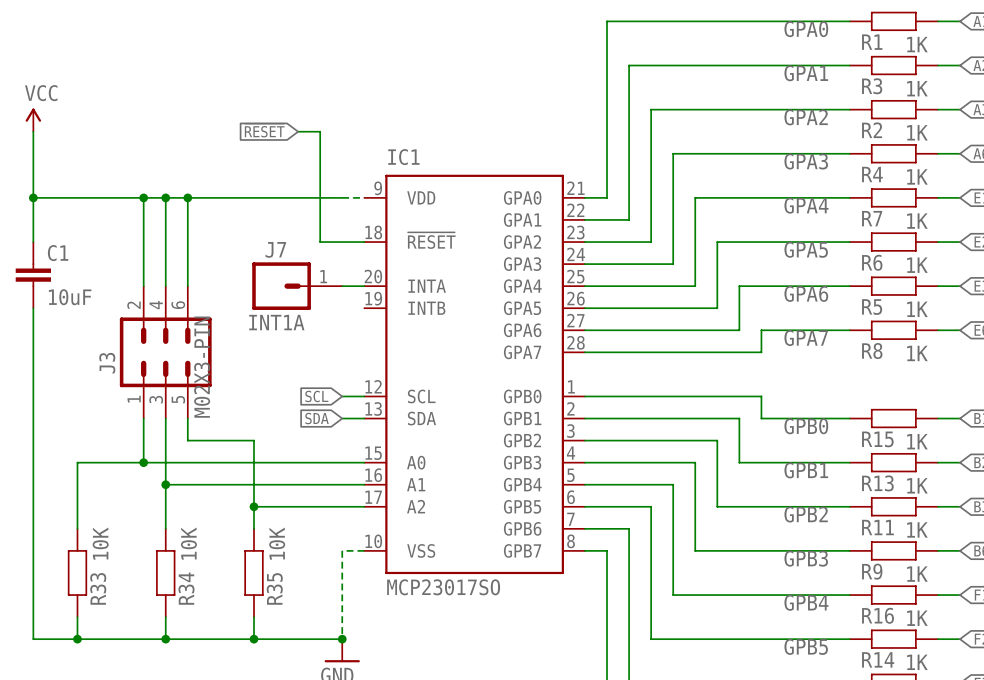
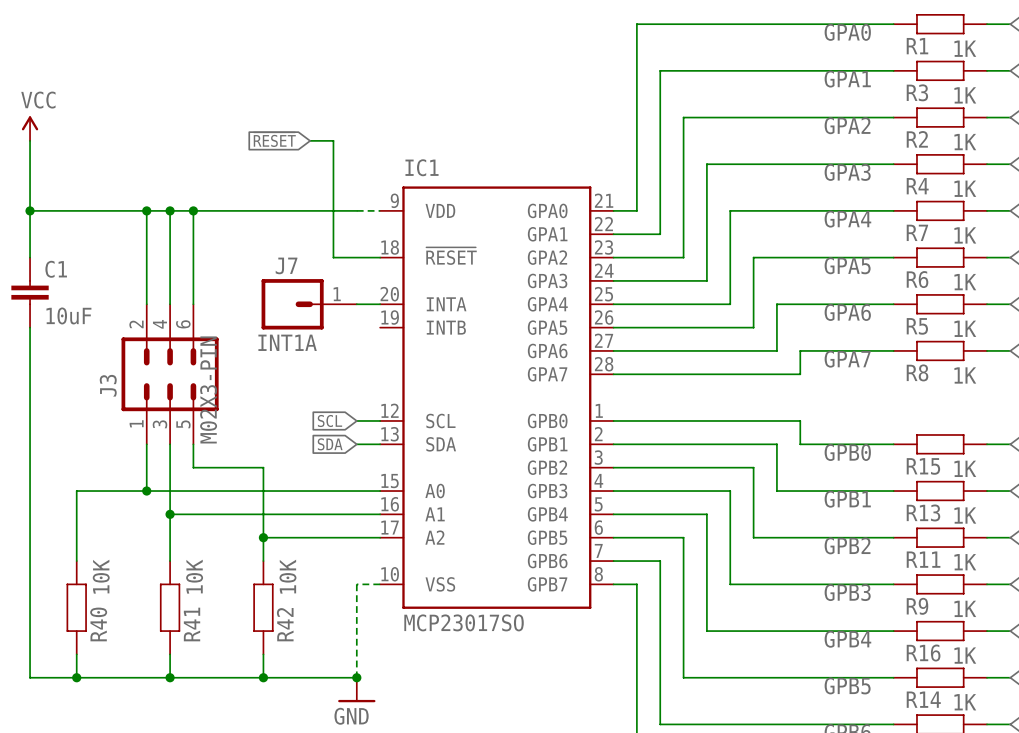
R33 name: R33 (98, 588) -> R40 (98, 624)
R34 name: R34 (186, 588) -> R41 (192, 624)
R35 name: R35 (274, 588) -> R42 (285, 624)

